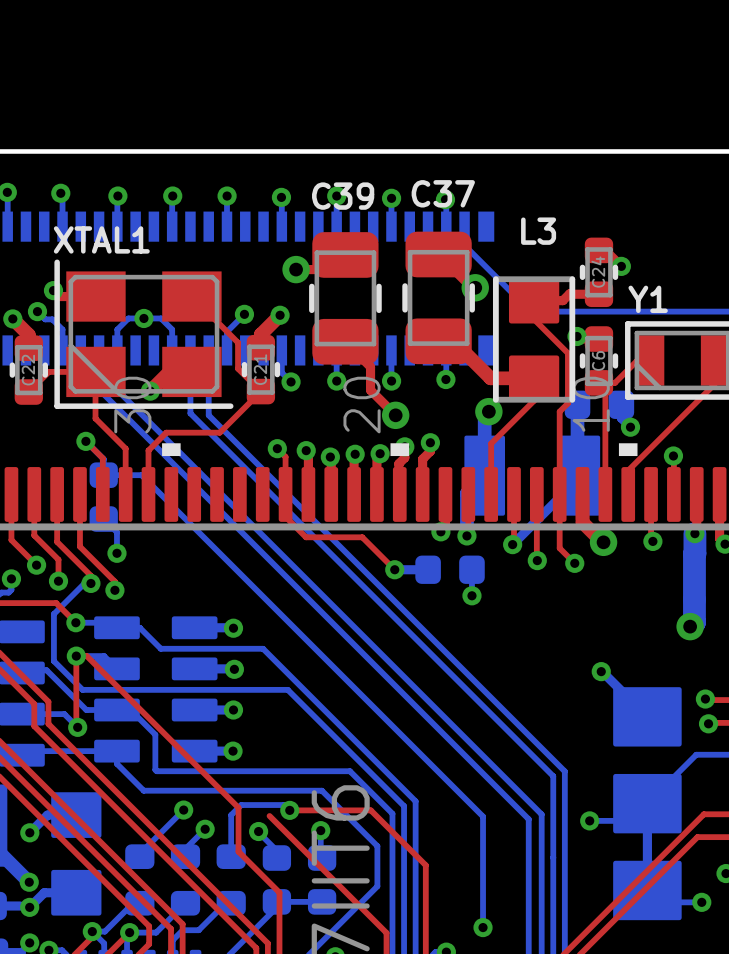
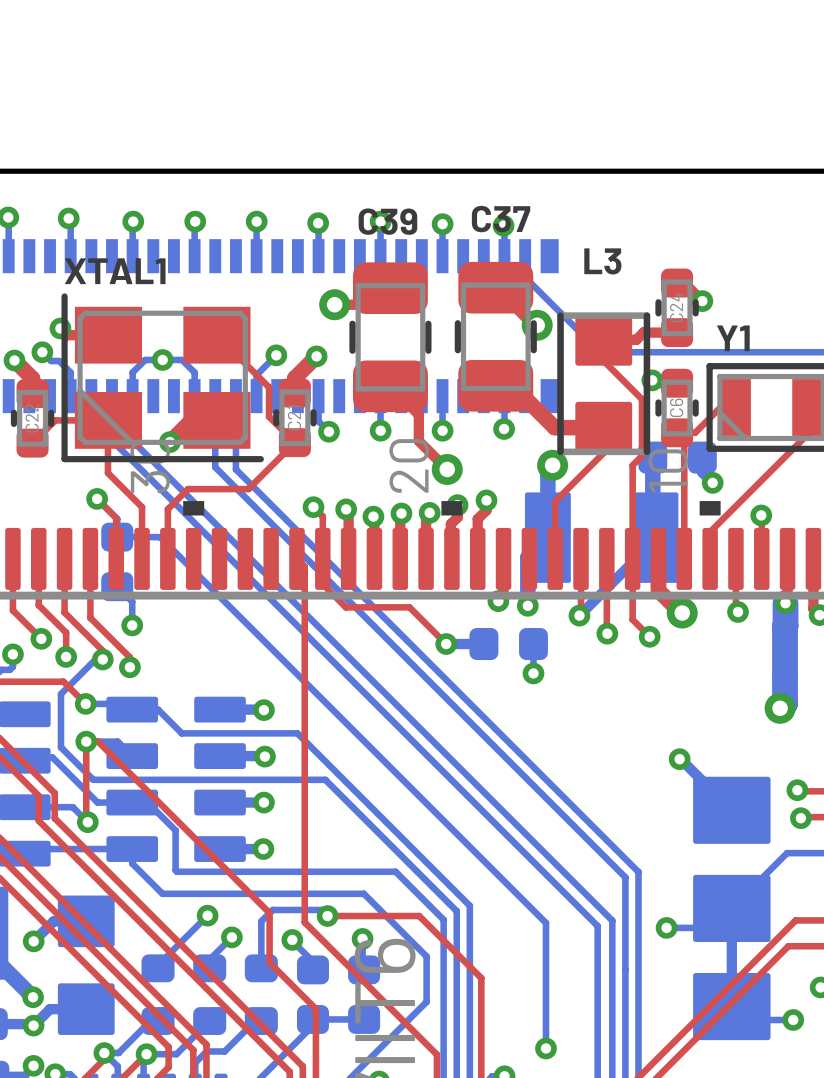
top track: none -> (296, 558) (304, 566) (304, 922)

